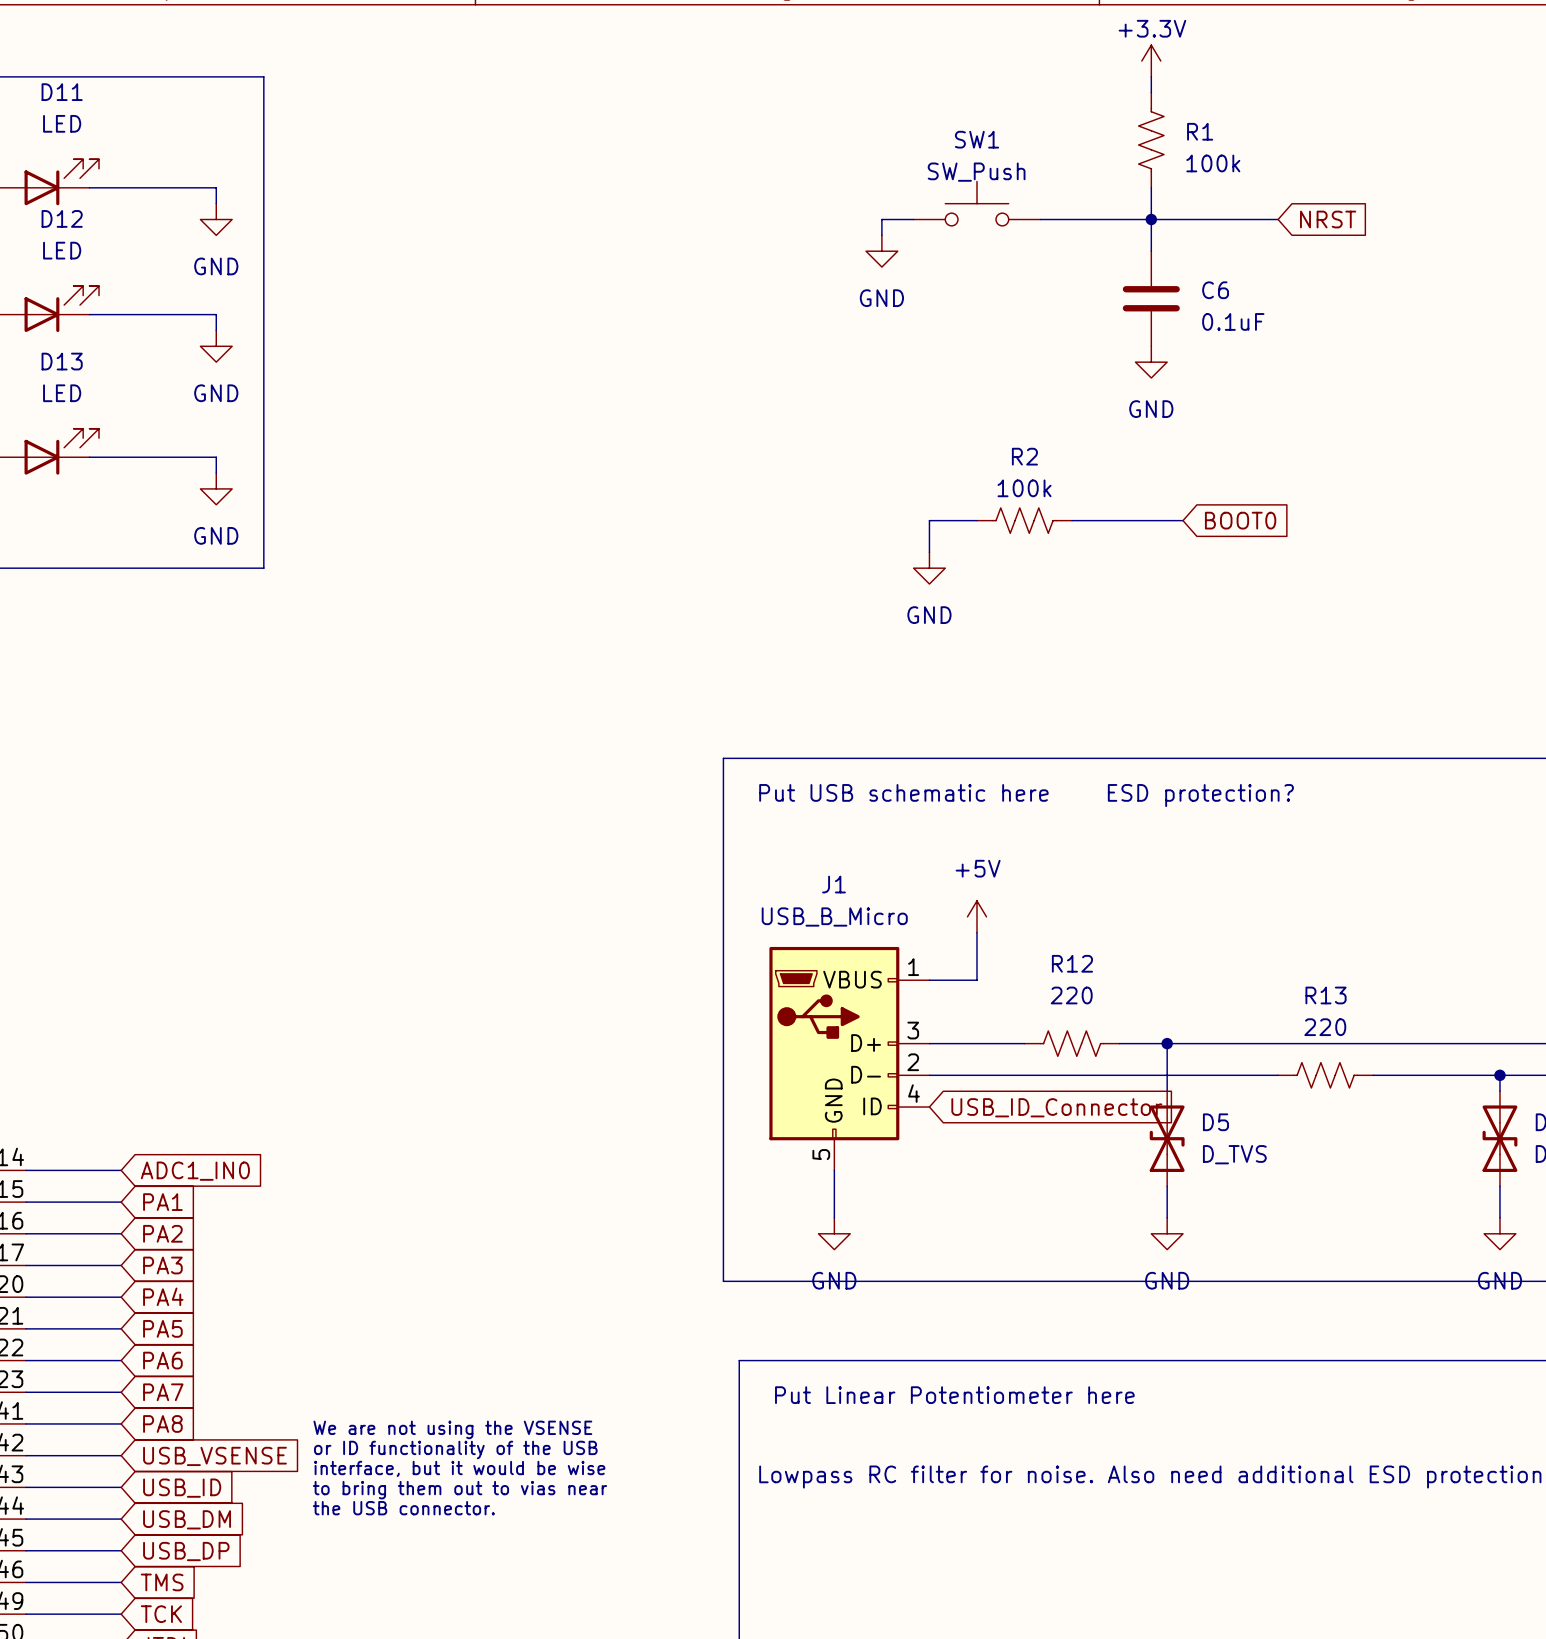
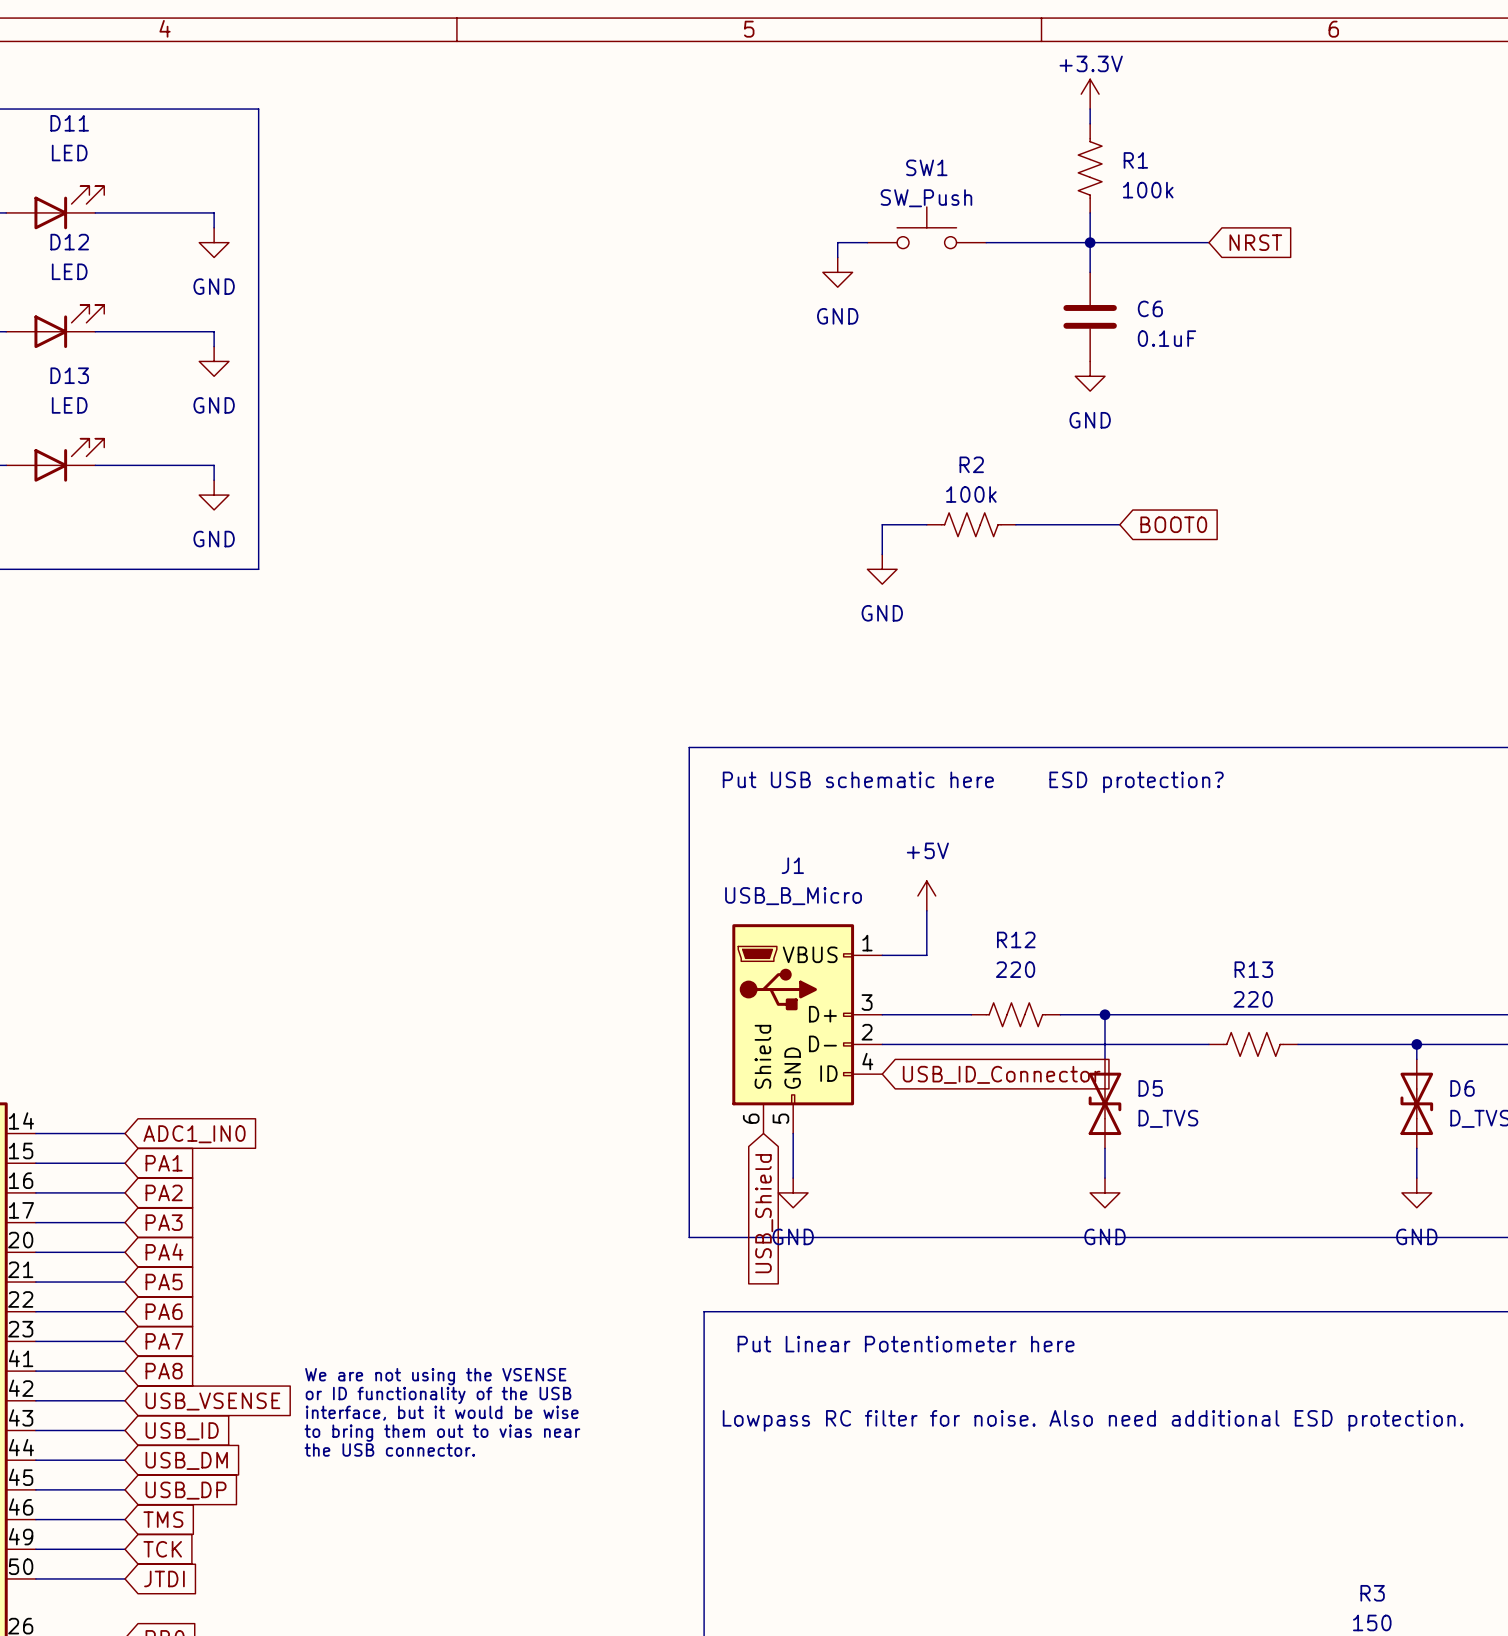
J1 symbol: [769, 946, 930, 1171] -> [732, 924, 883, 1134]
global label: none -> USB_Shield (764, 1213)

